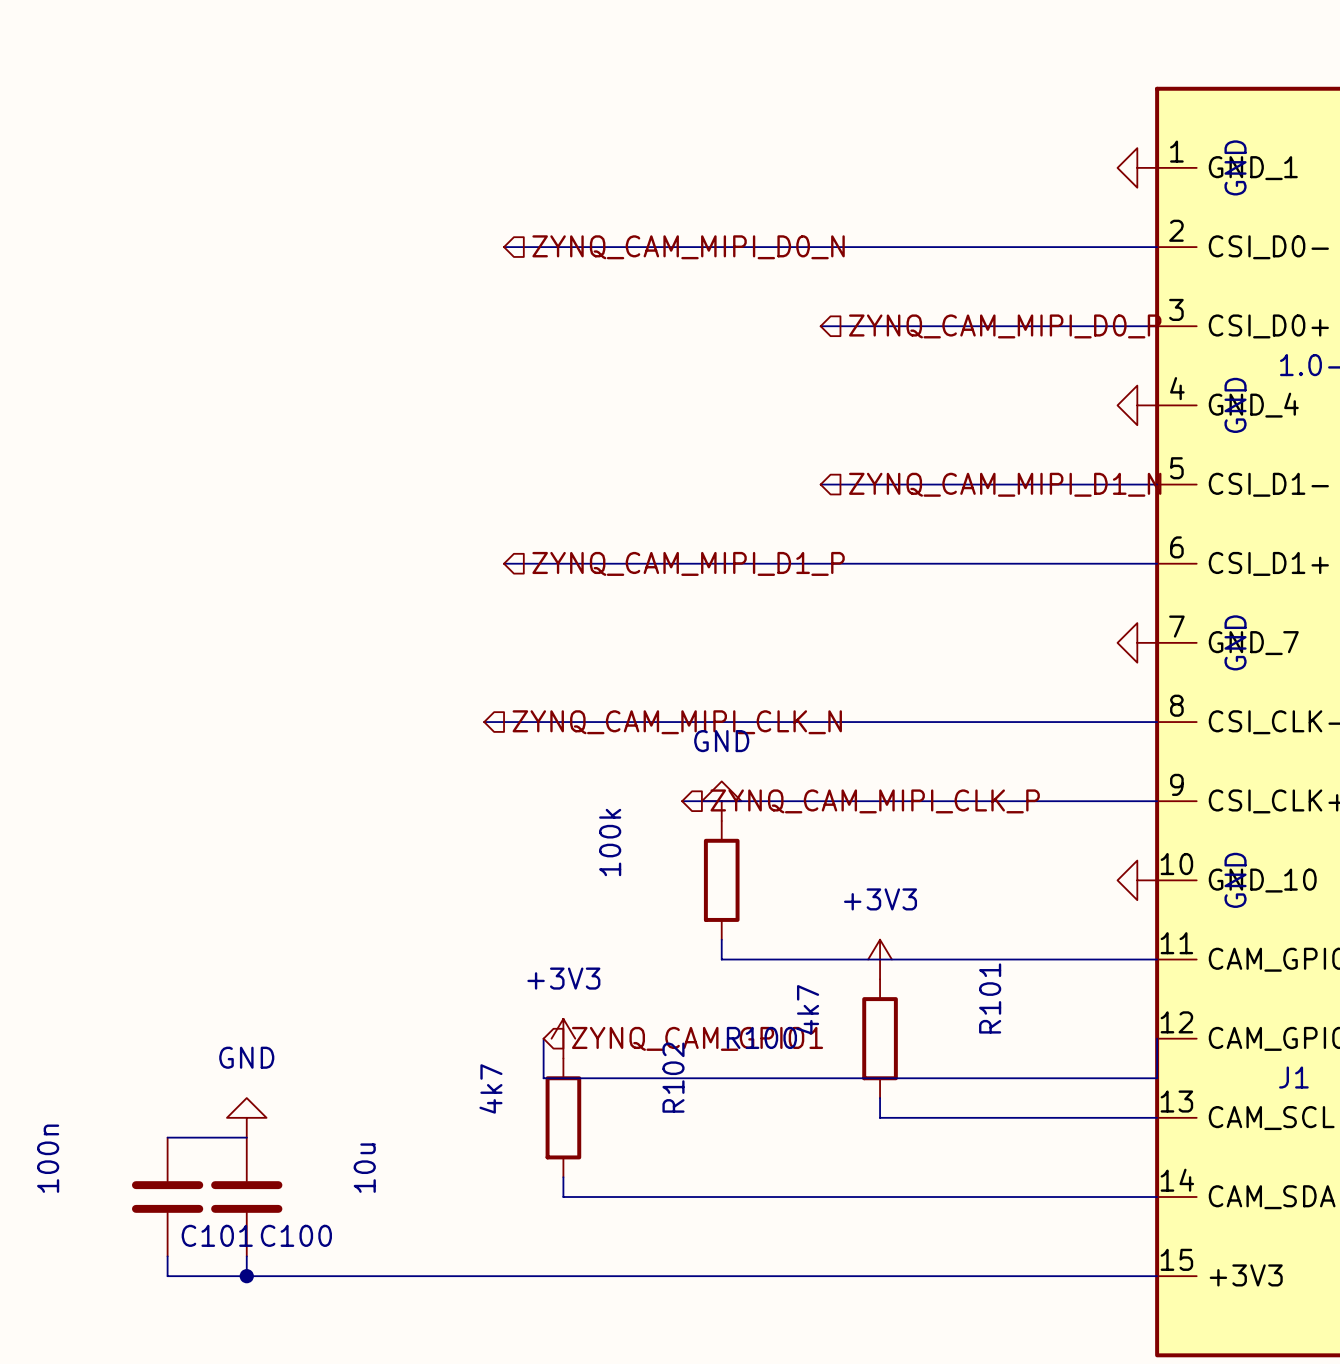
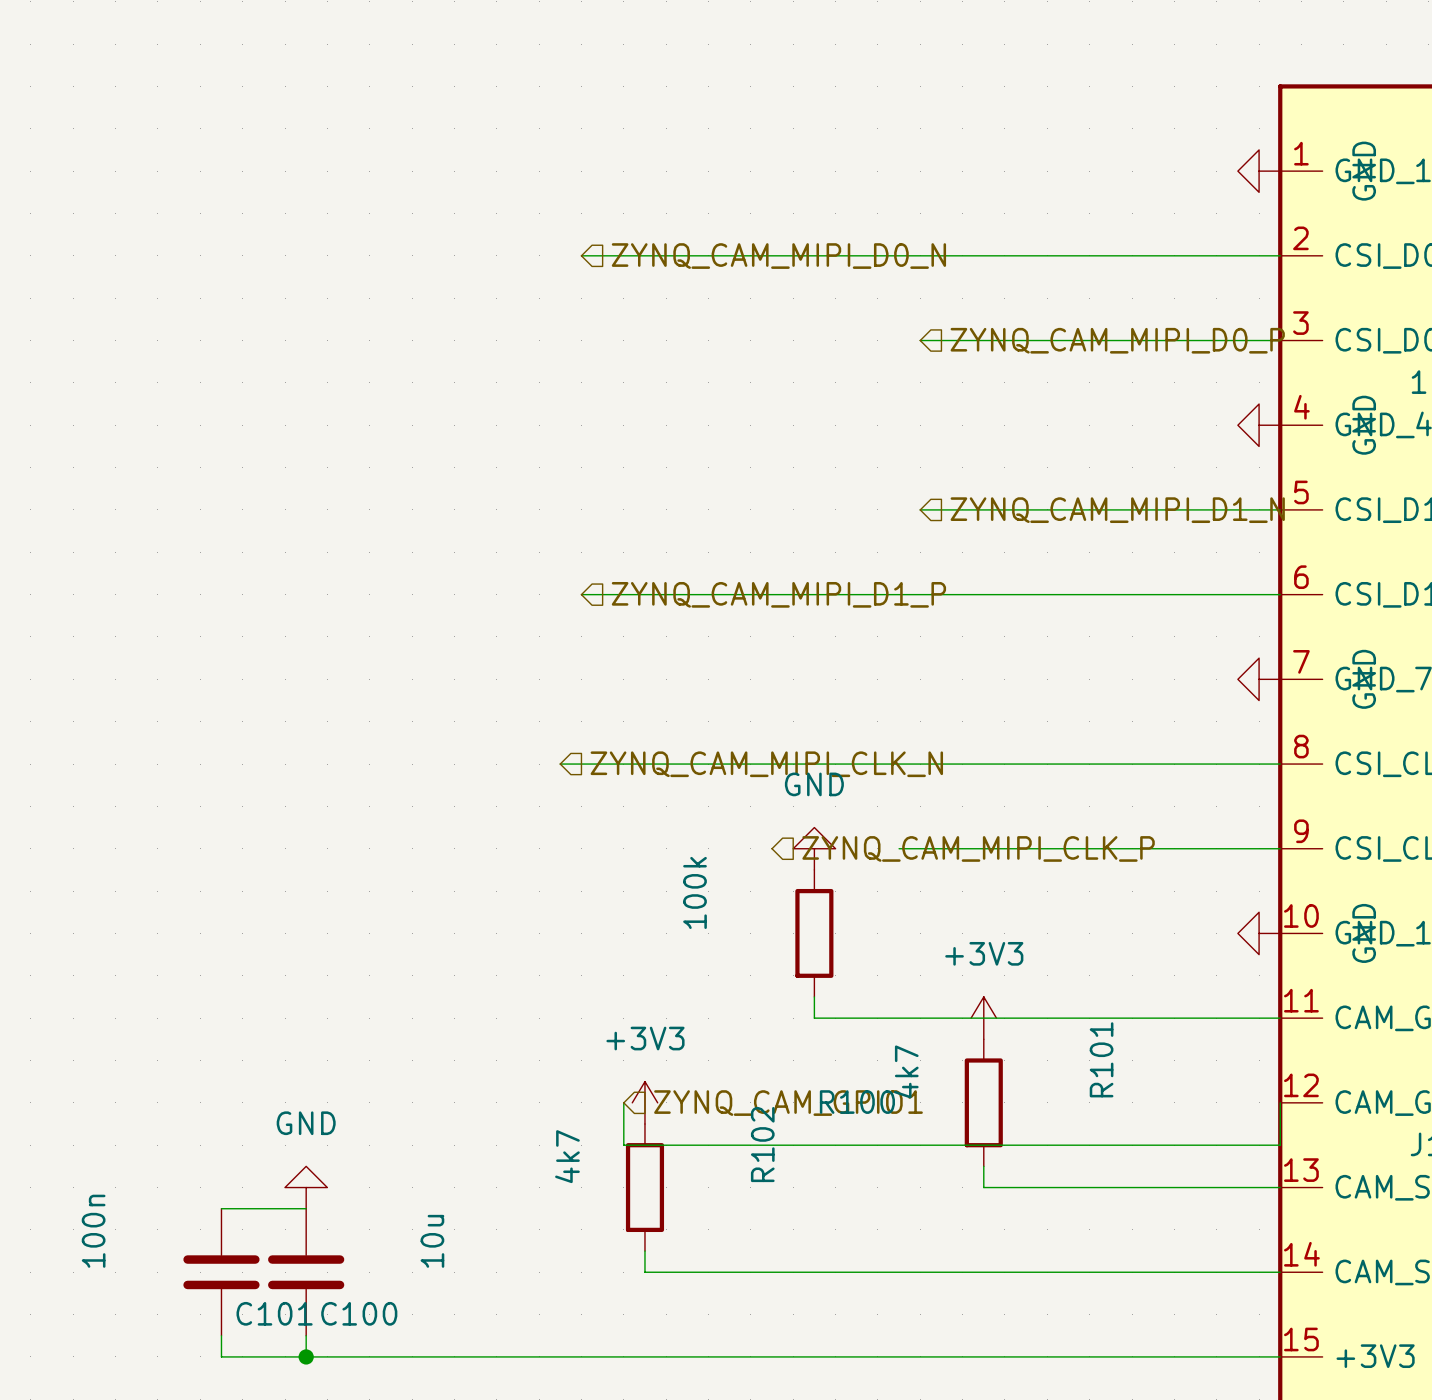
wire: (682, 801) (800, 801) -> none

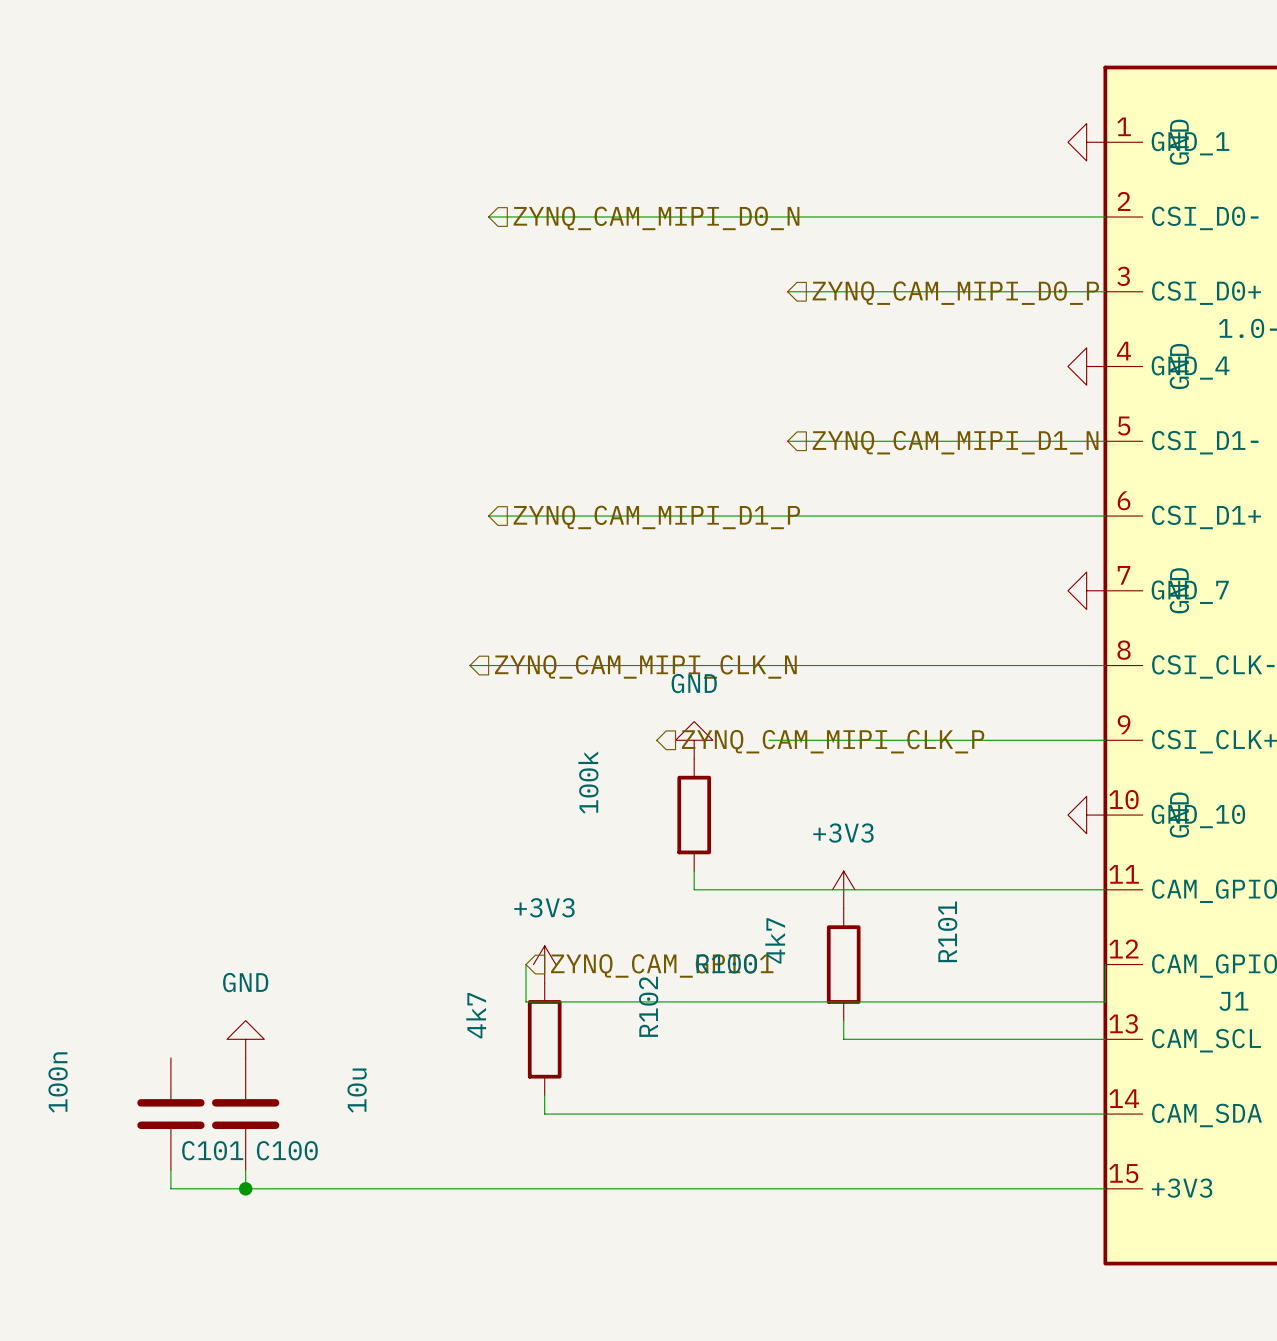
wire: (221, 1208) (306, 1208) -> none

